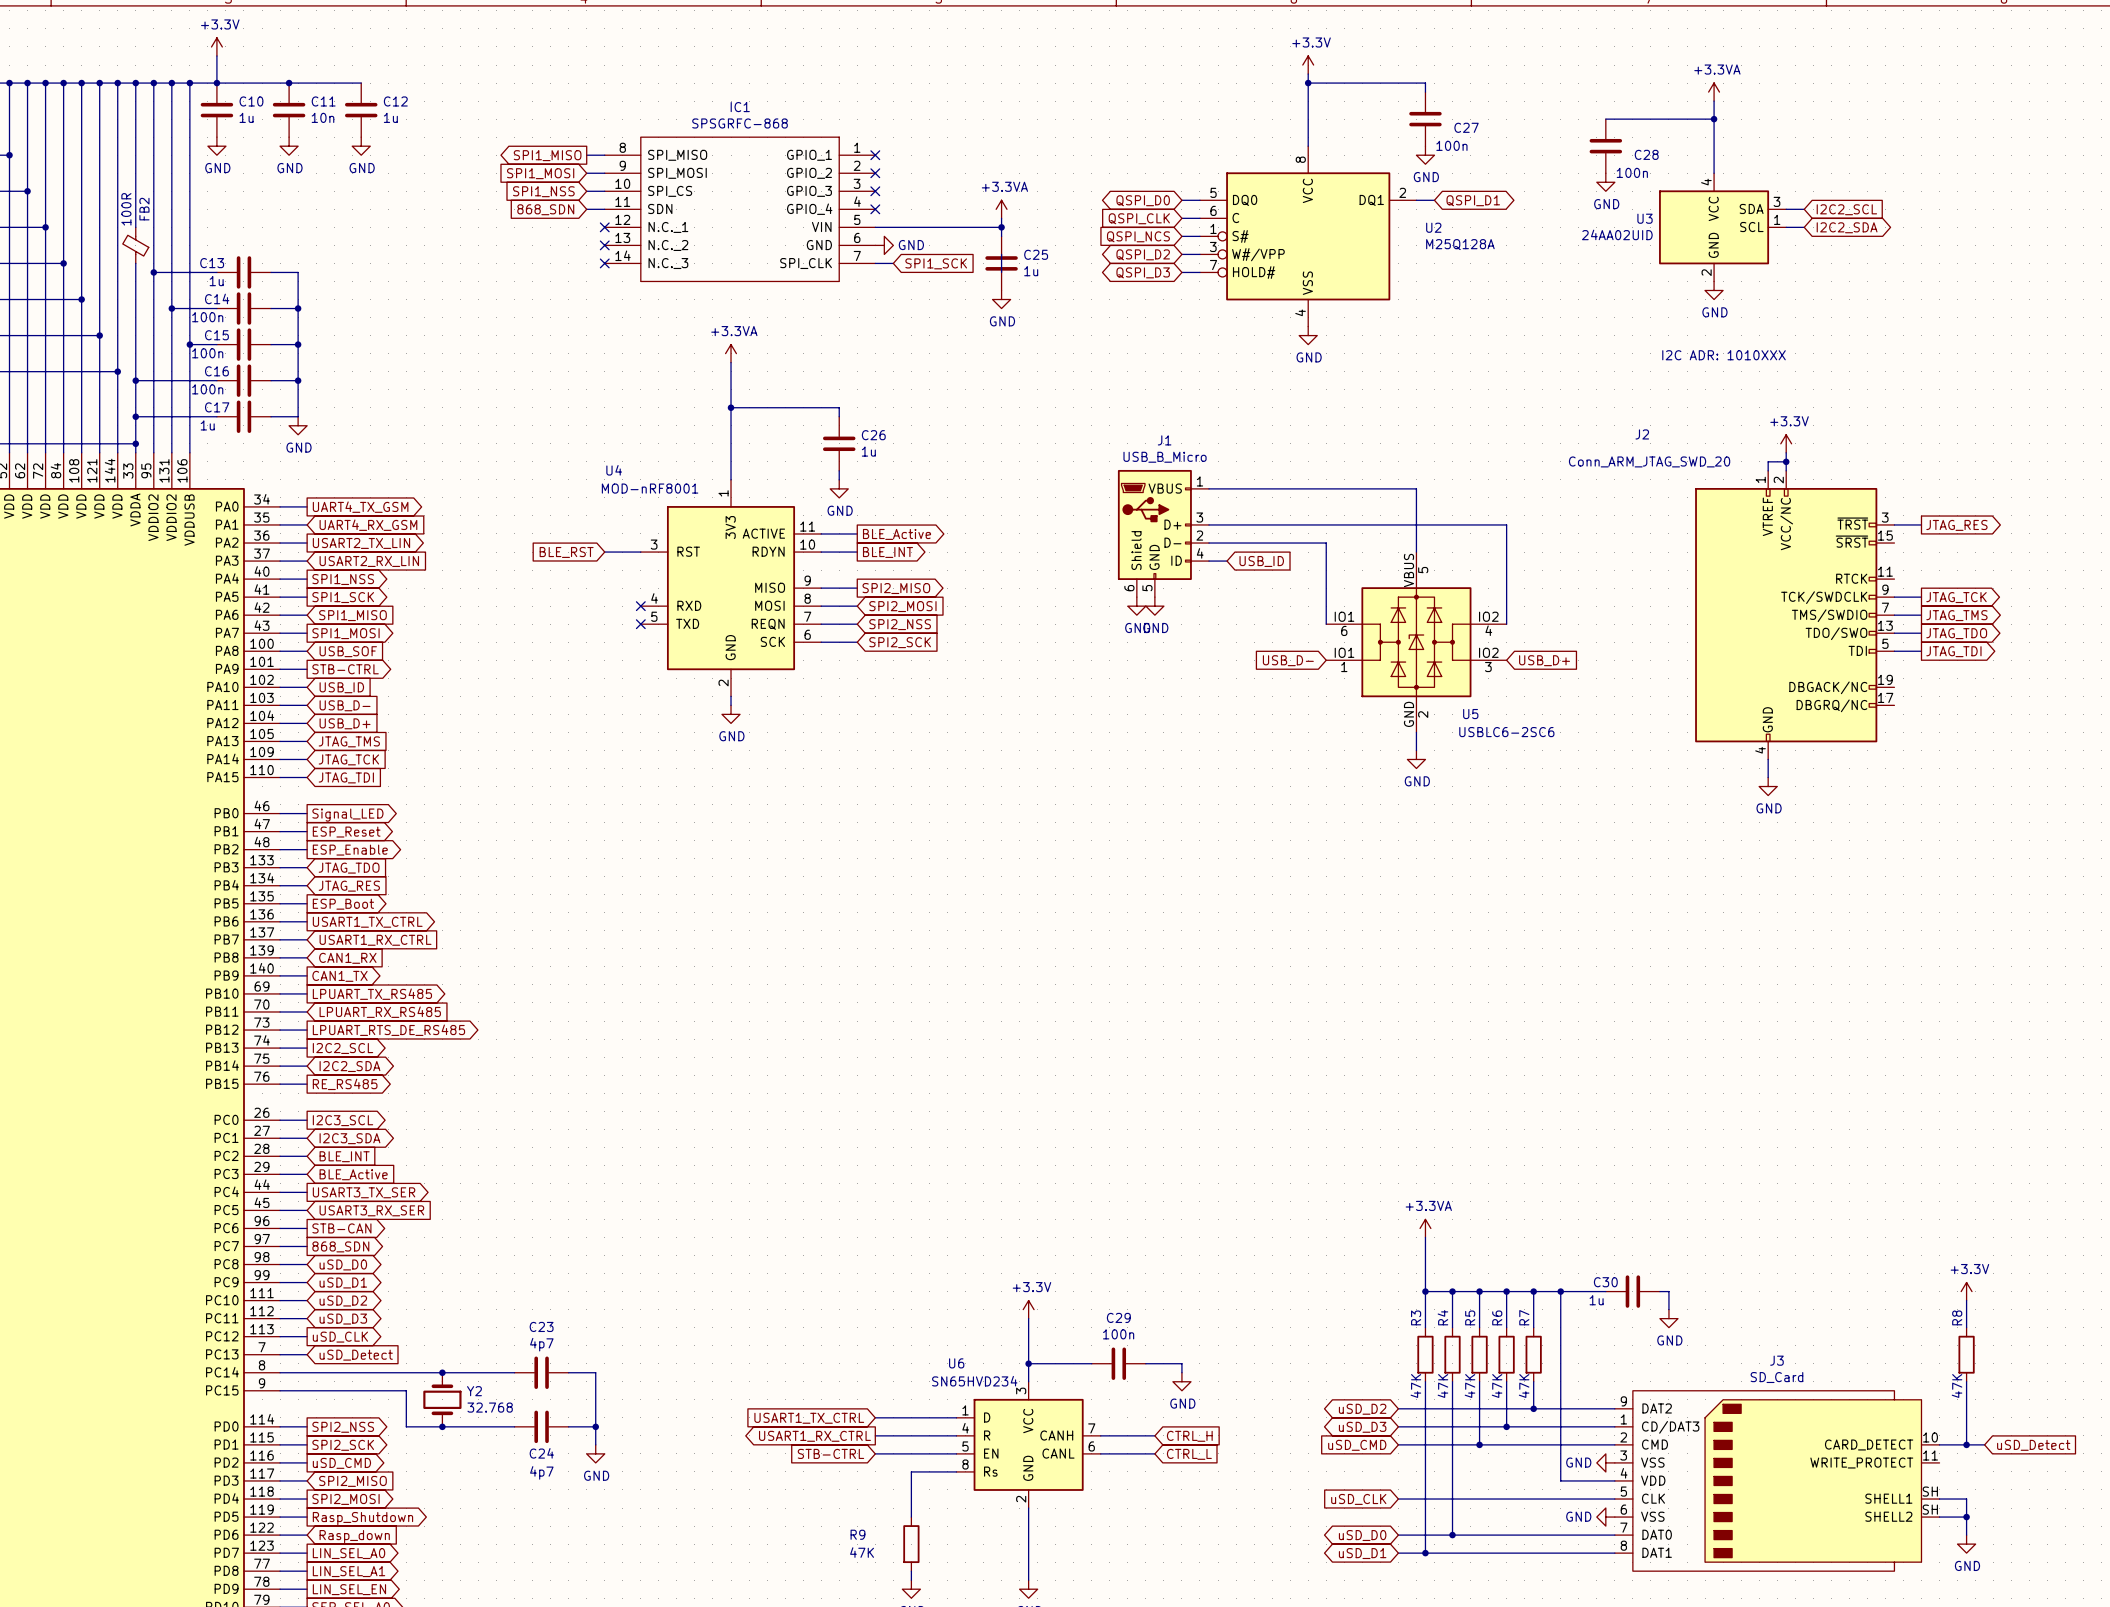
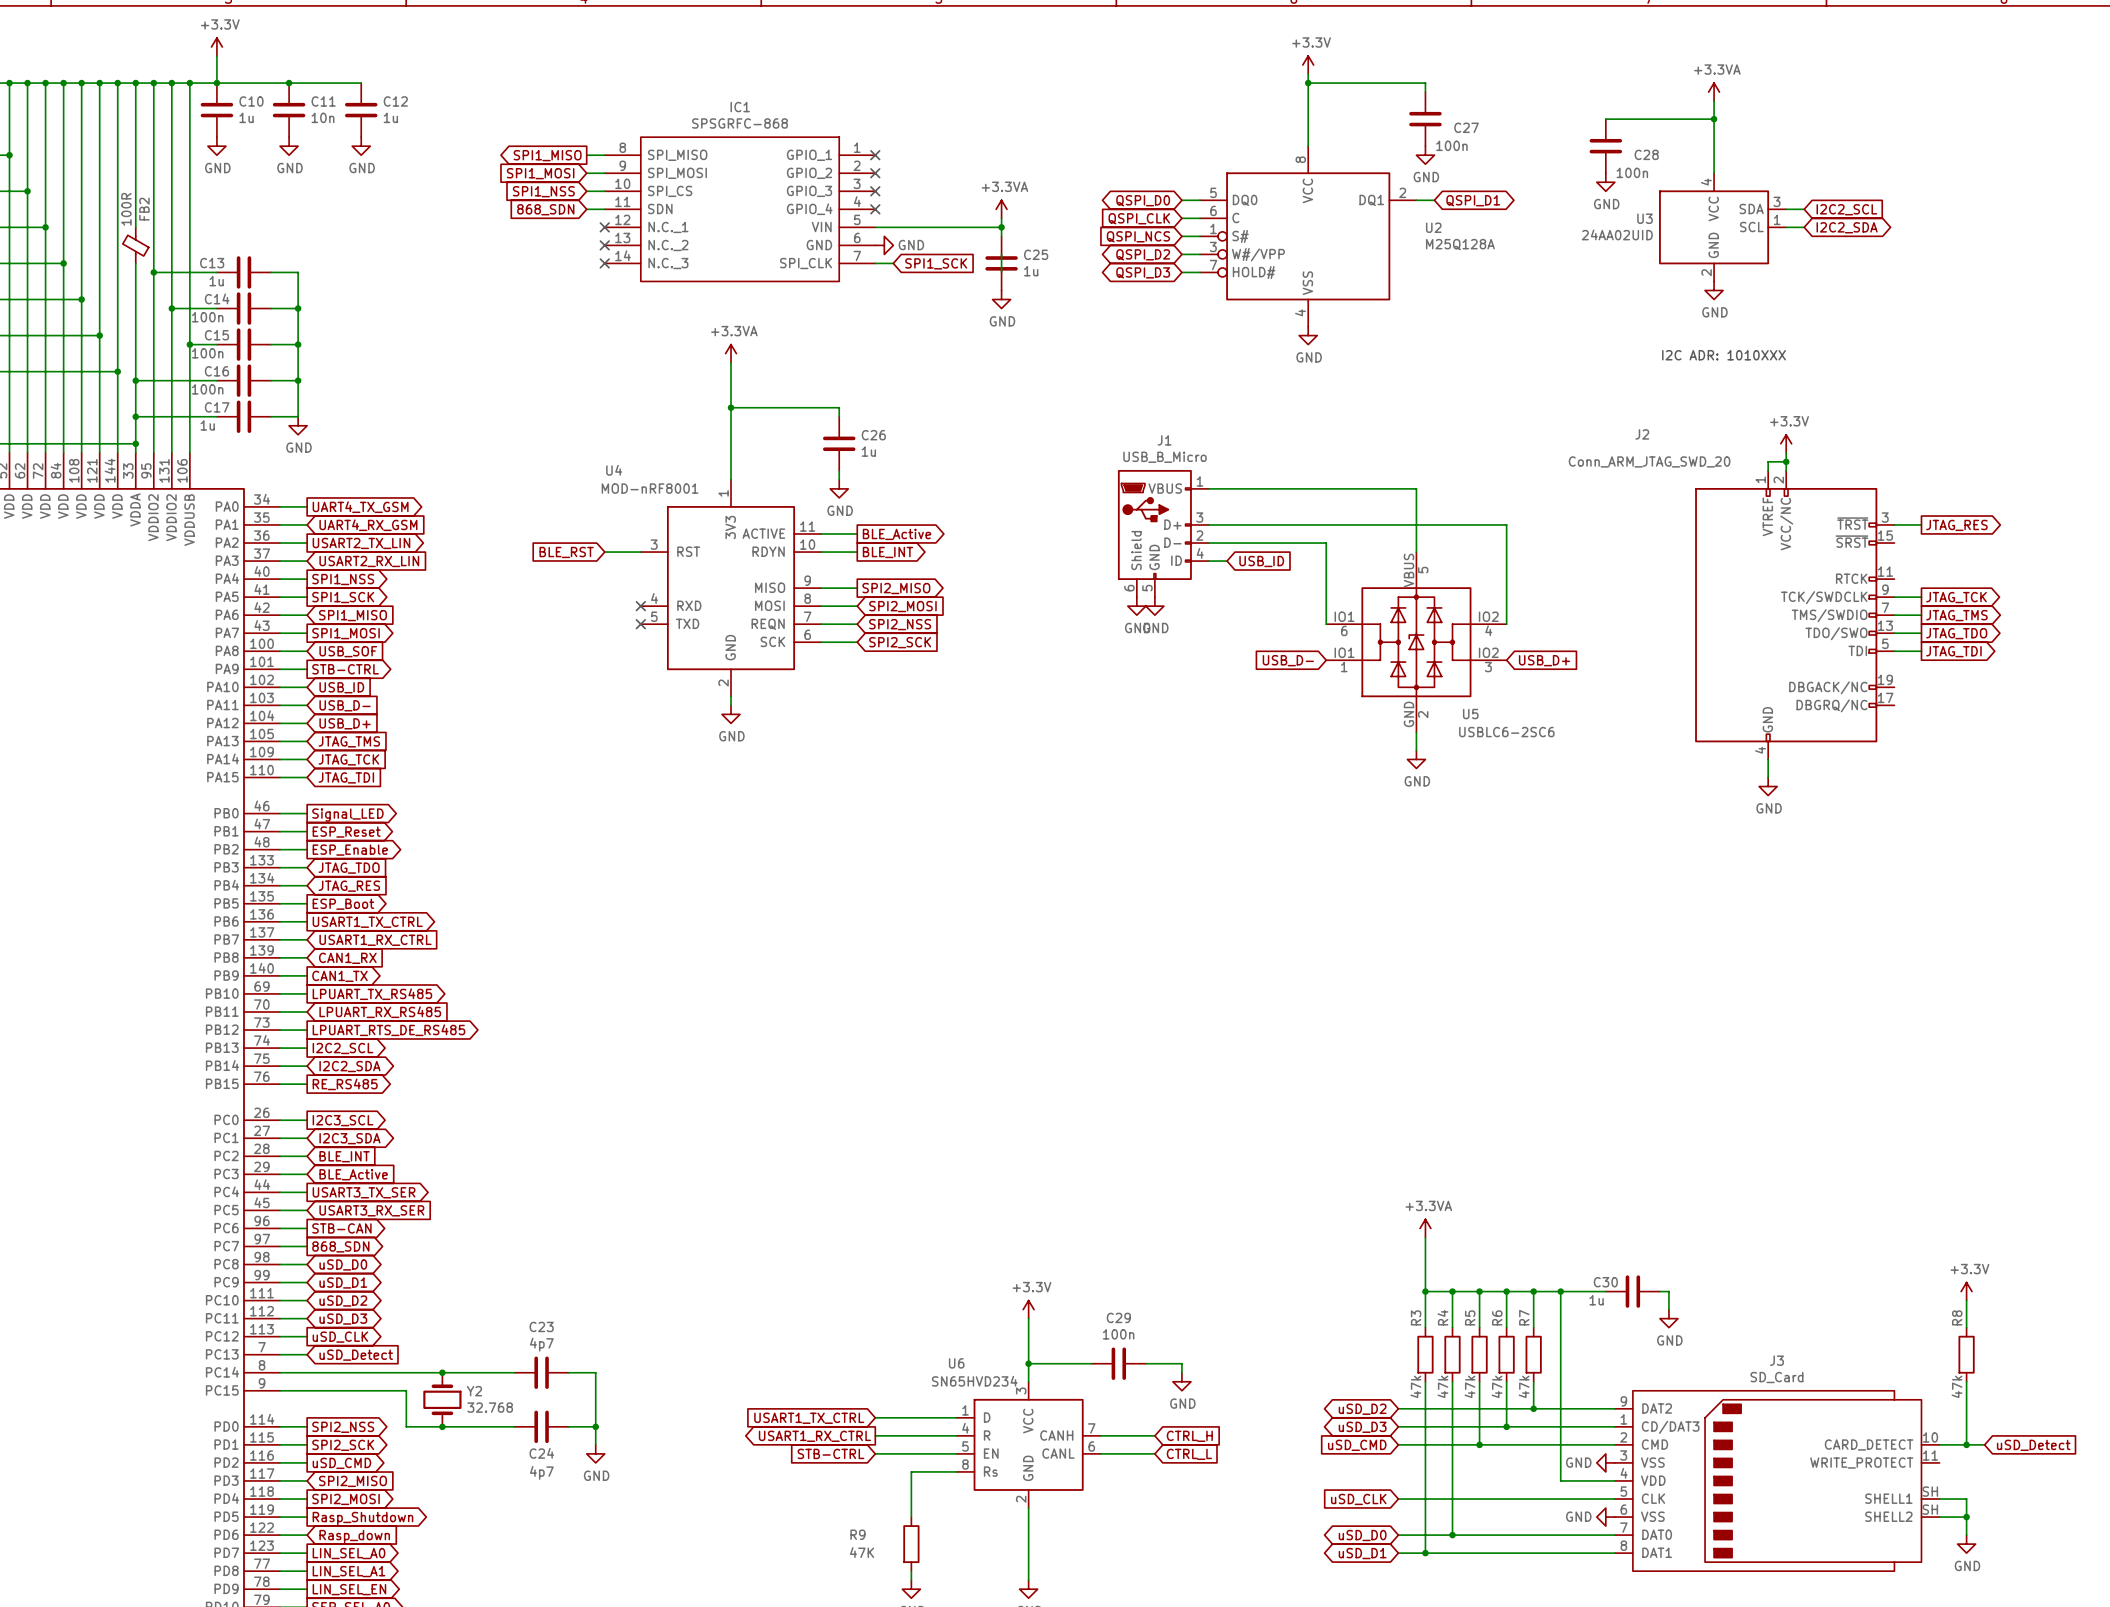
R3 value: 47K (1415, 1385) -> 47k (1415, 1386)
R4 value: 47K (1442, 1385) -> 47k (1442, 1386)
R5 value: 47K (1469, 1385) -> 47k (1469, 1386)
R6 value: 47K (1497, 1385) -> 47k (1497, 1386)
R7 value: 47K (1524, 1385) -> 47k (1524, 1386)
R8 value: 47K (1957, 1385) -> 47k (1957, 1386)

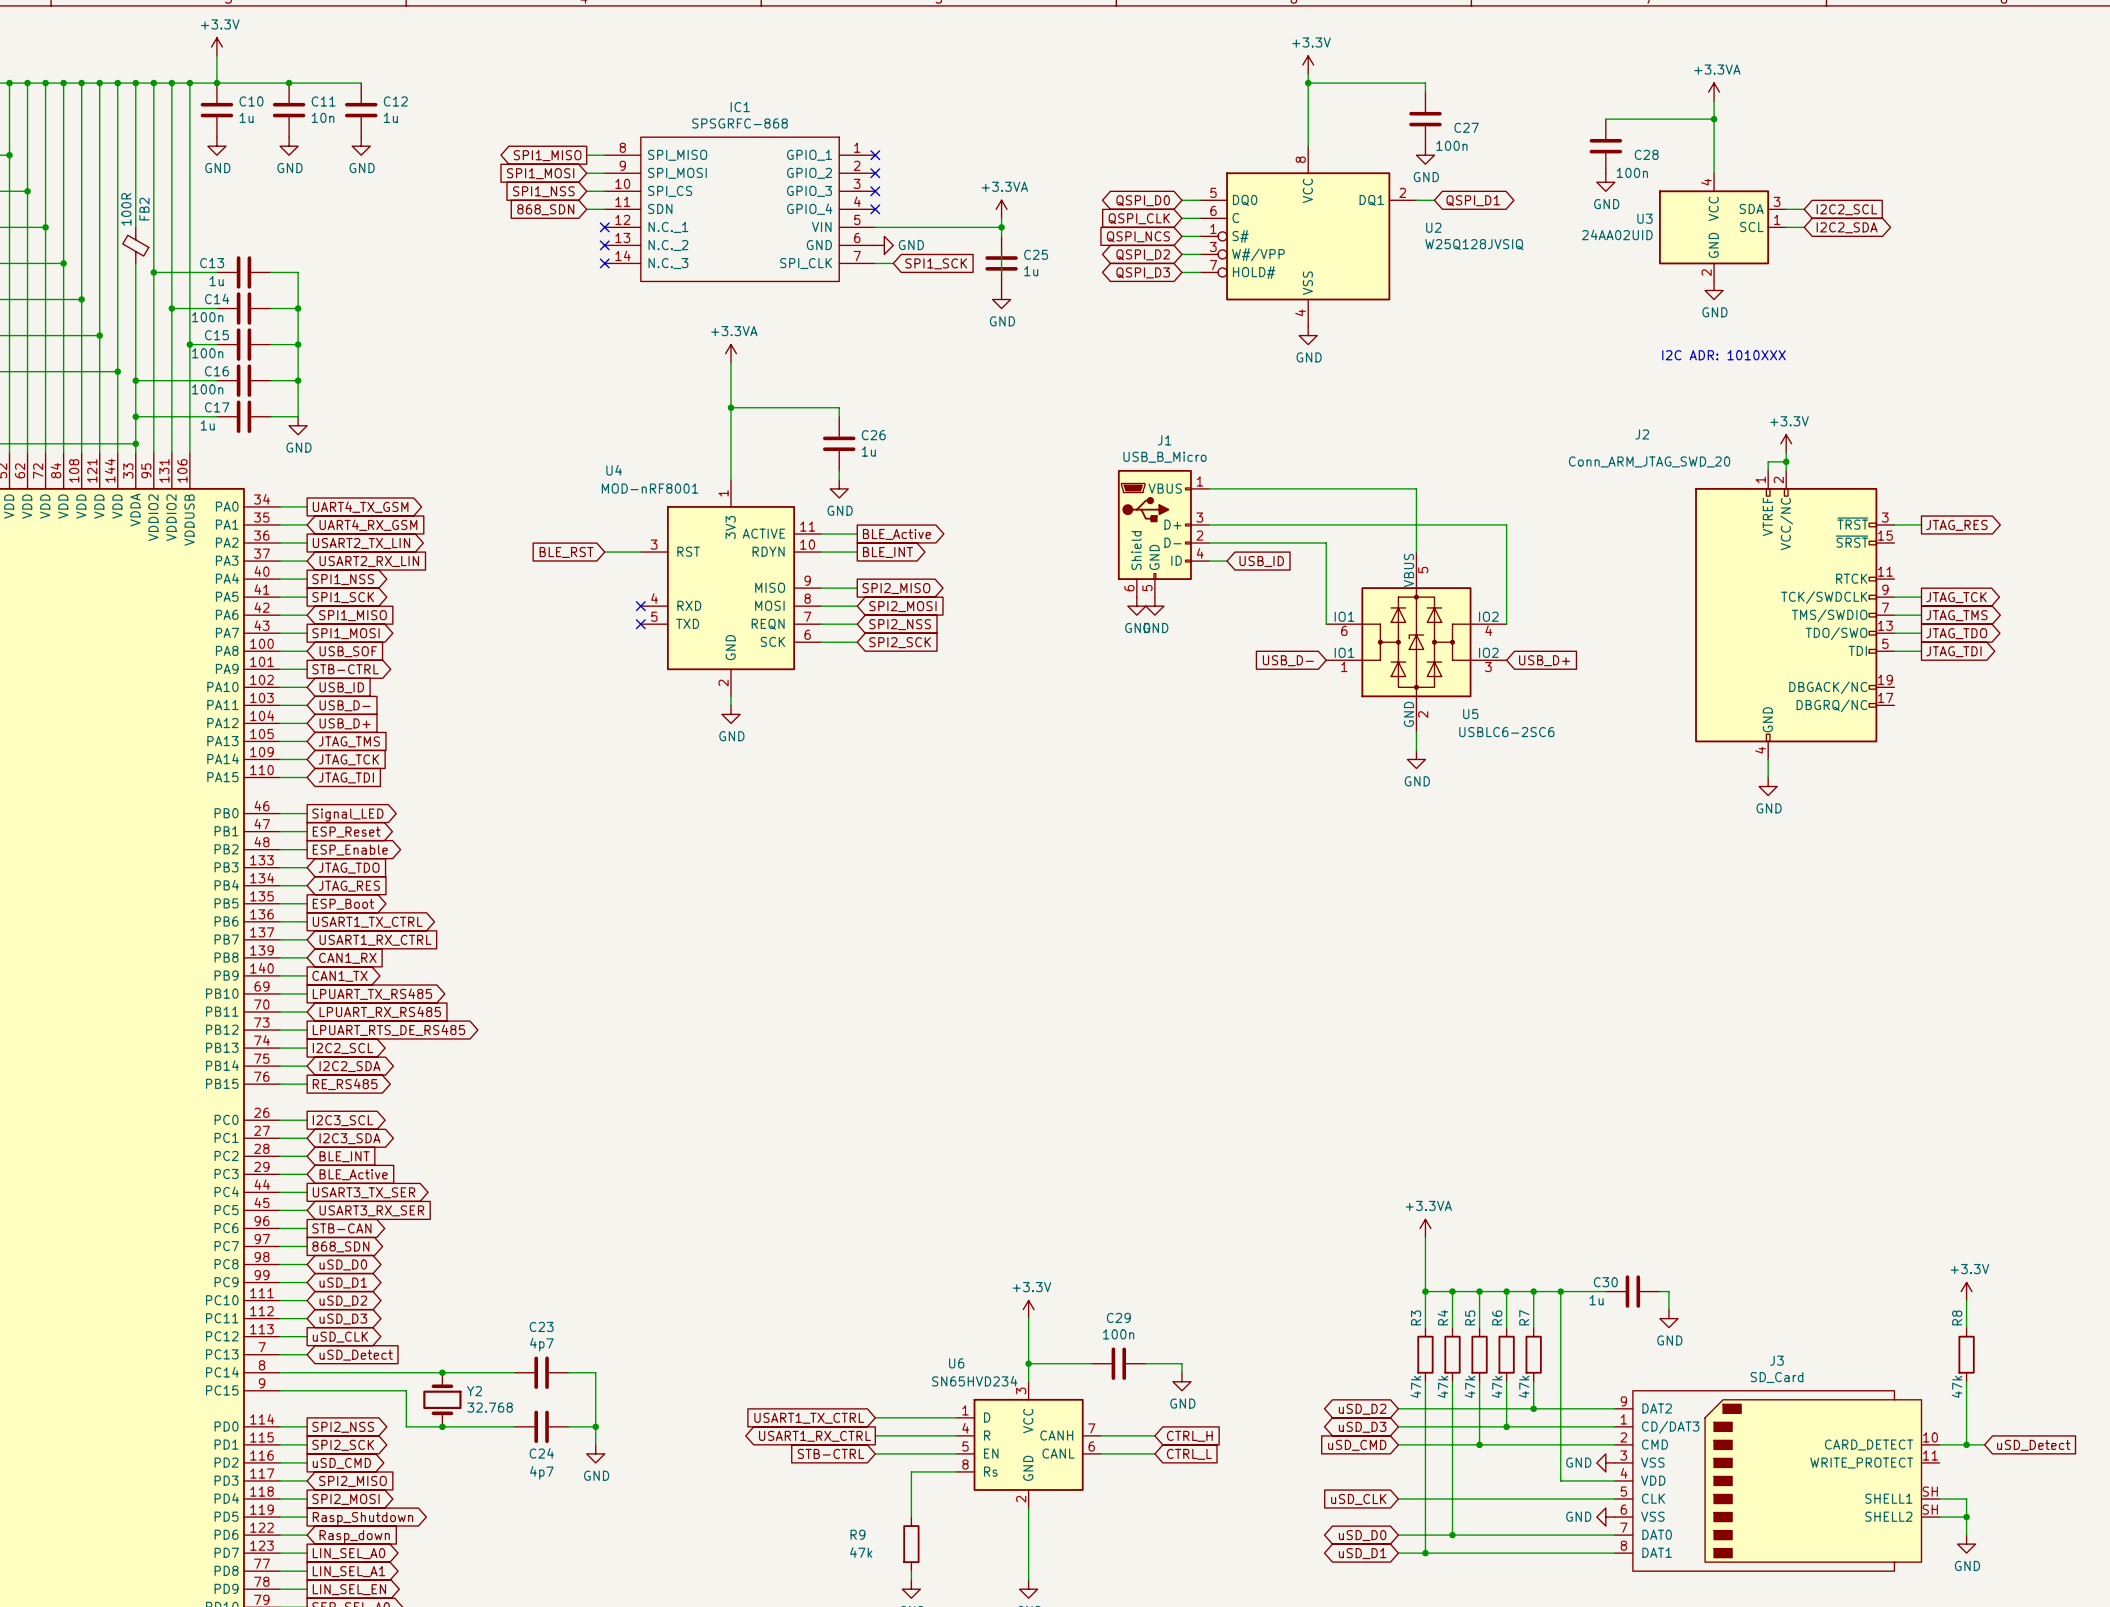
U2 value: M25Q128A (1460, 244) -> W25Q128JVSIQ (1474, 244)
R9 value: 47K (862, 1552) -> 47k (861, 1552)

